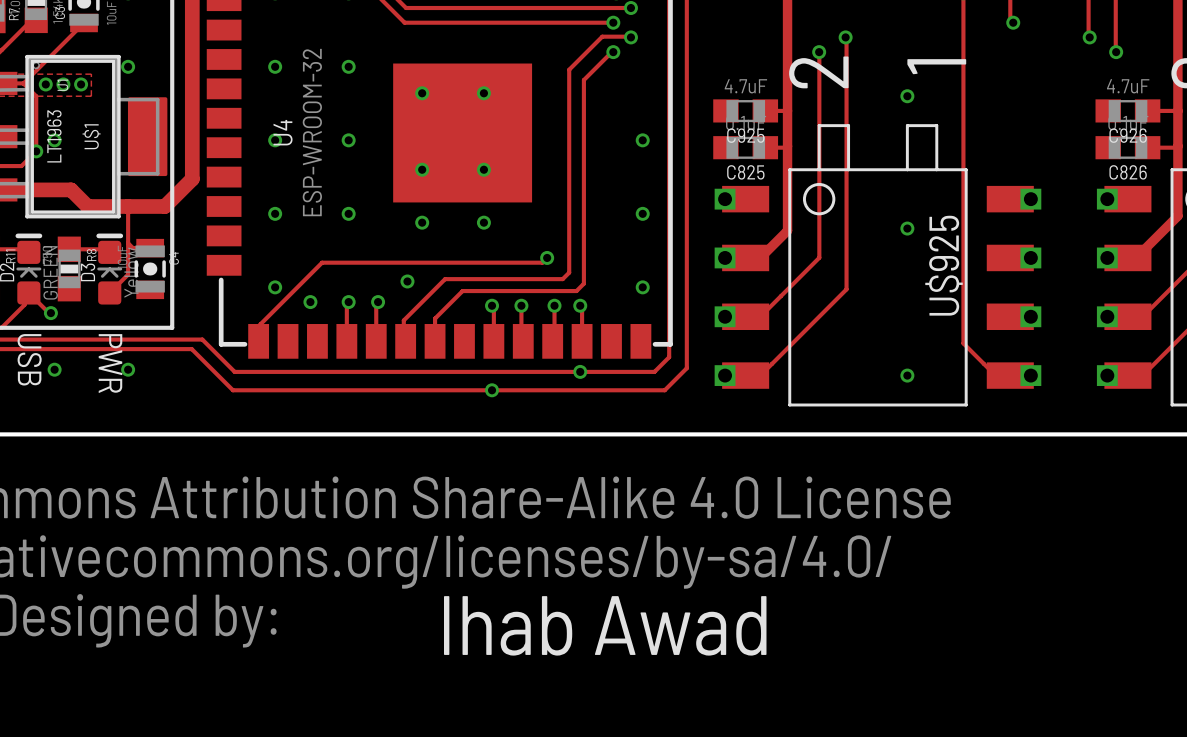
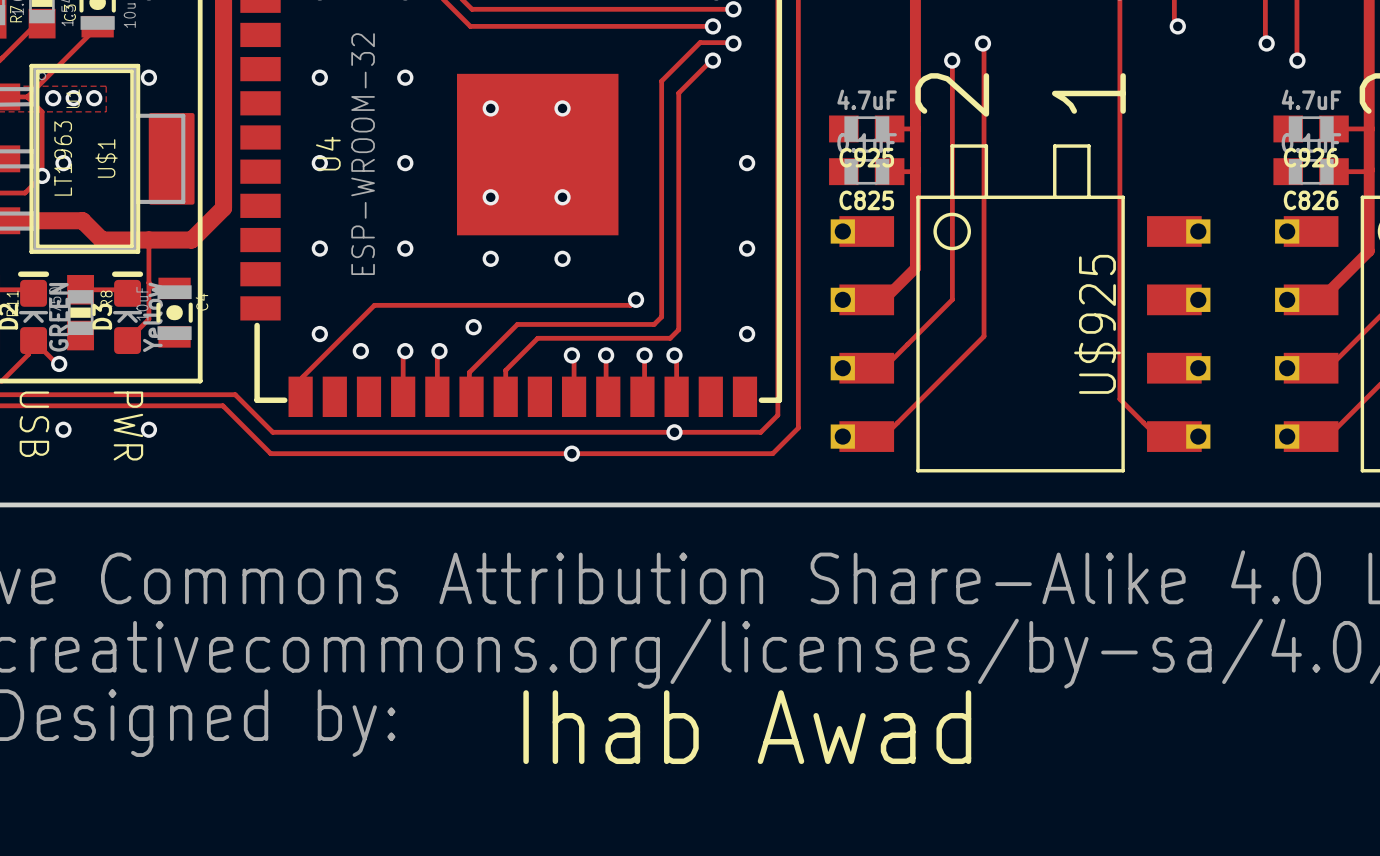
via: (907, 96) -> none
via: (907, 228) -> none
via: (907, 375) -> none

